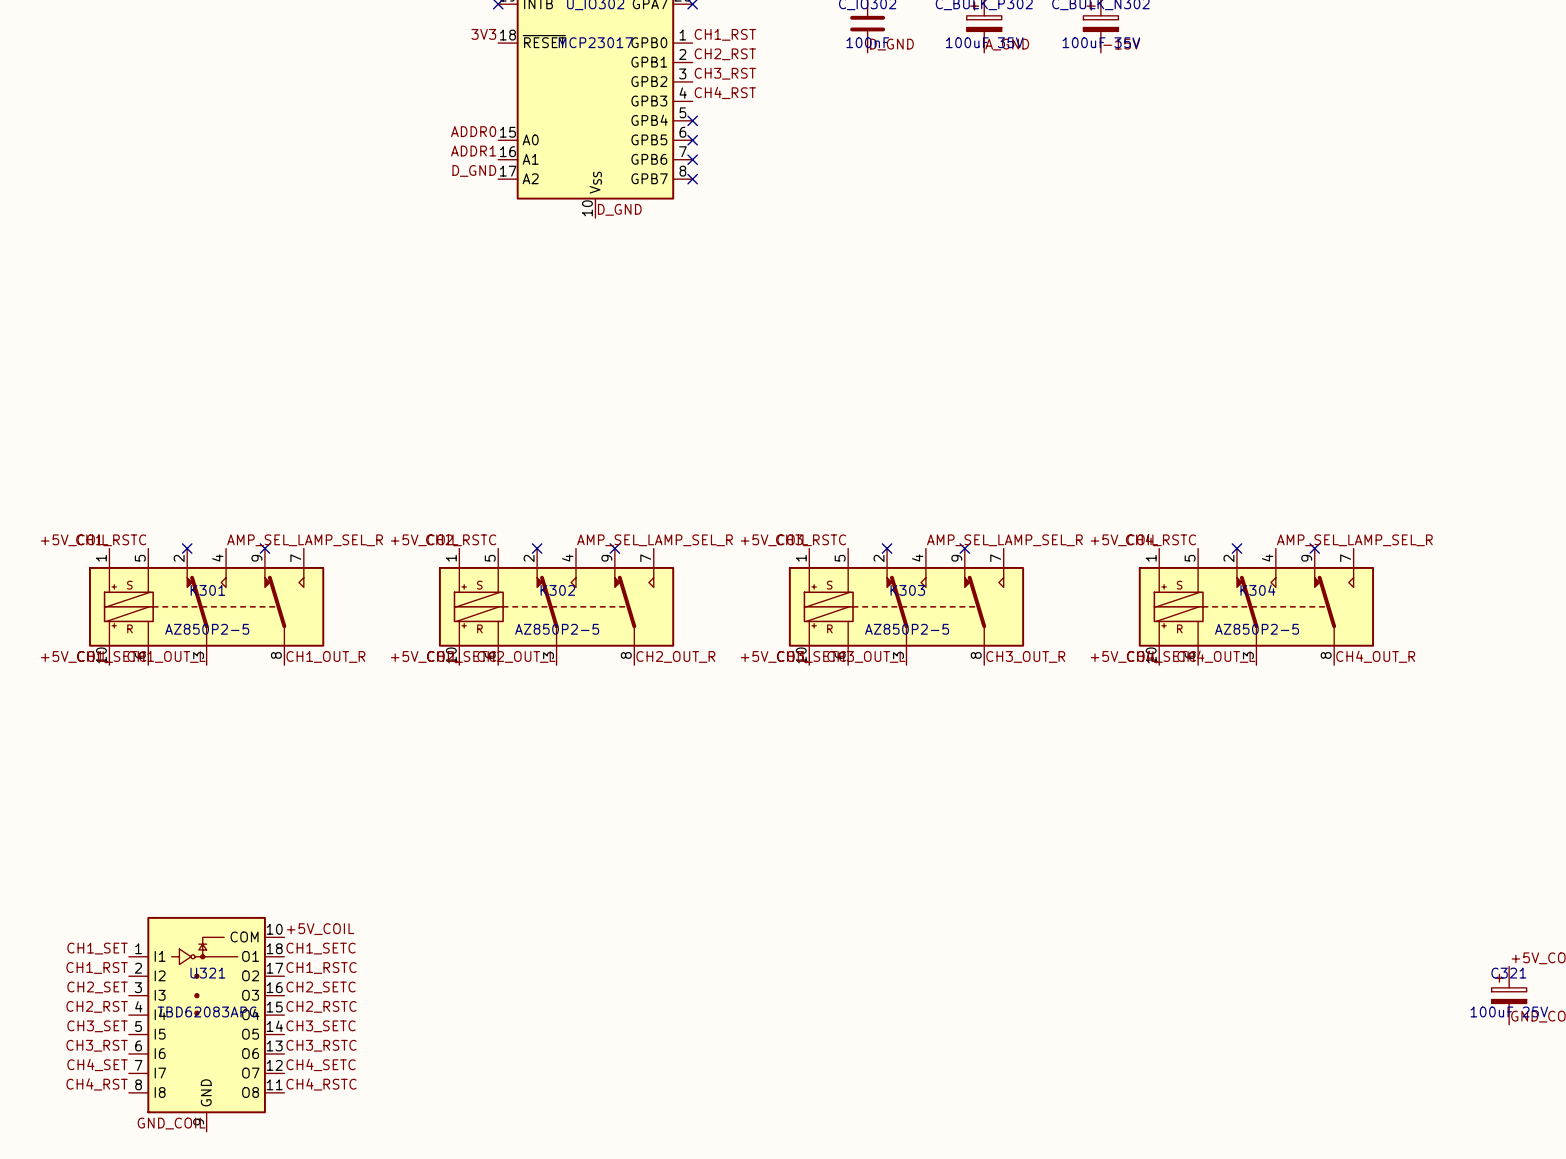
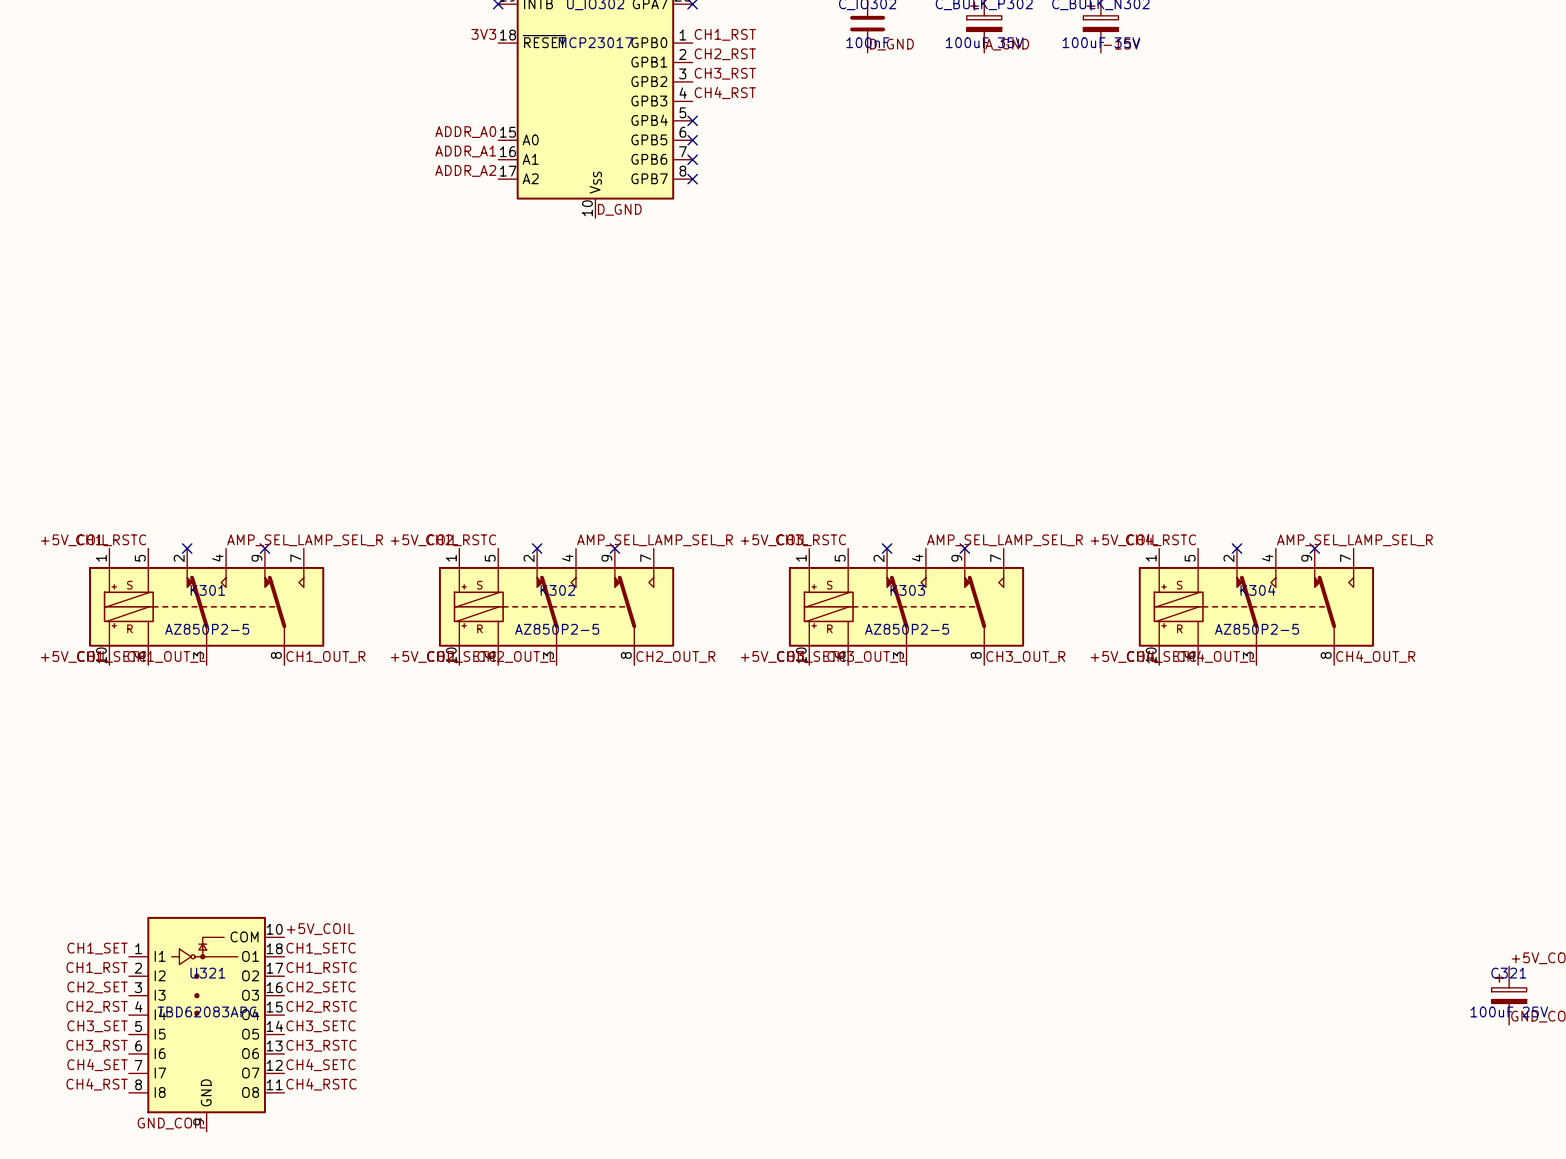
label: ADDR0 (473, 131) -> ADDR_A0 (465, 132)
label: ADDR1 (473, 151) -> ADDR_A1 (465, 151)
label: D_GND (474, 170) -> ADDR_A2 (465, 170)

